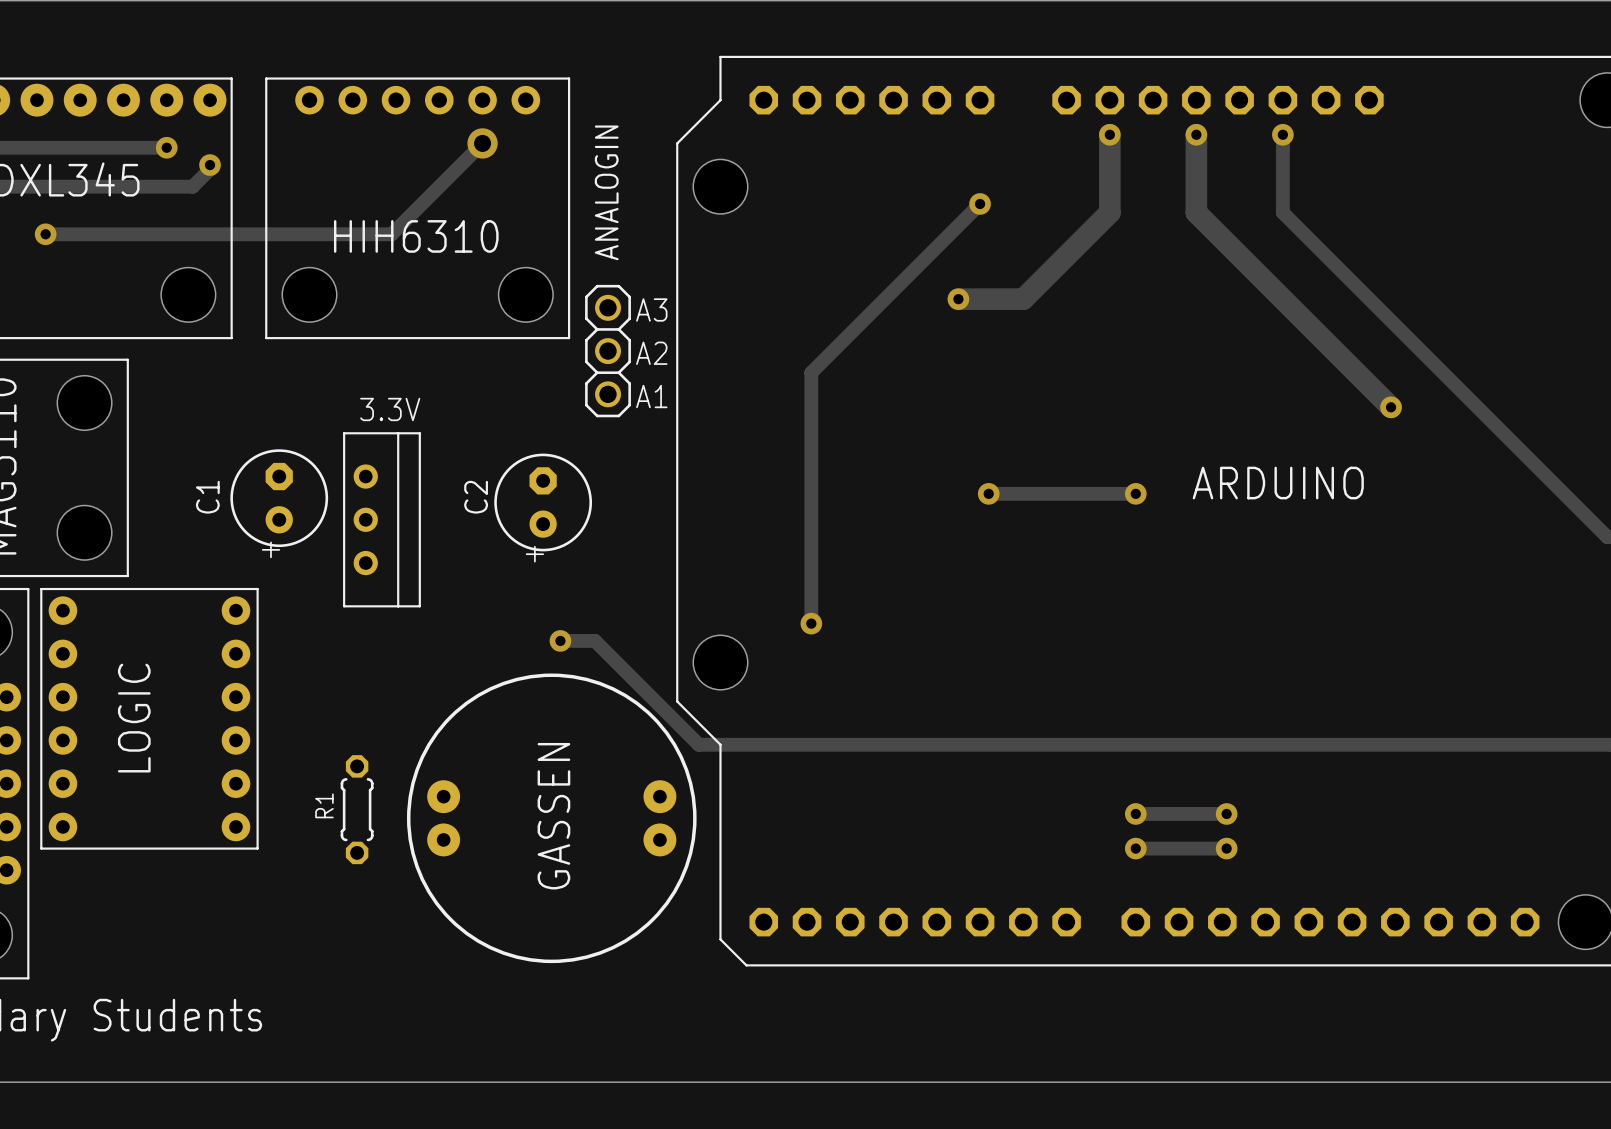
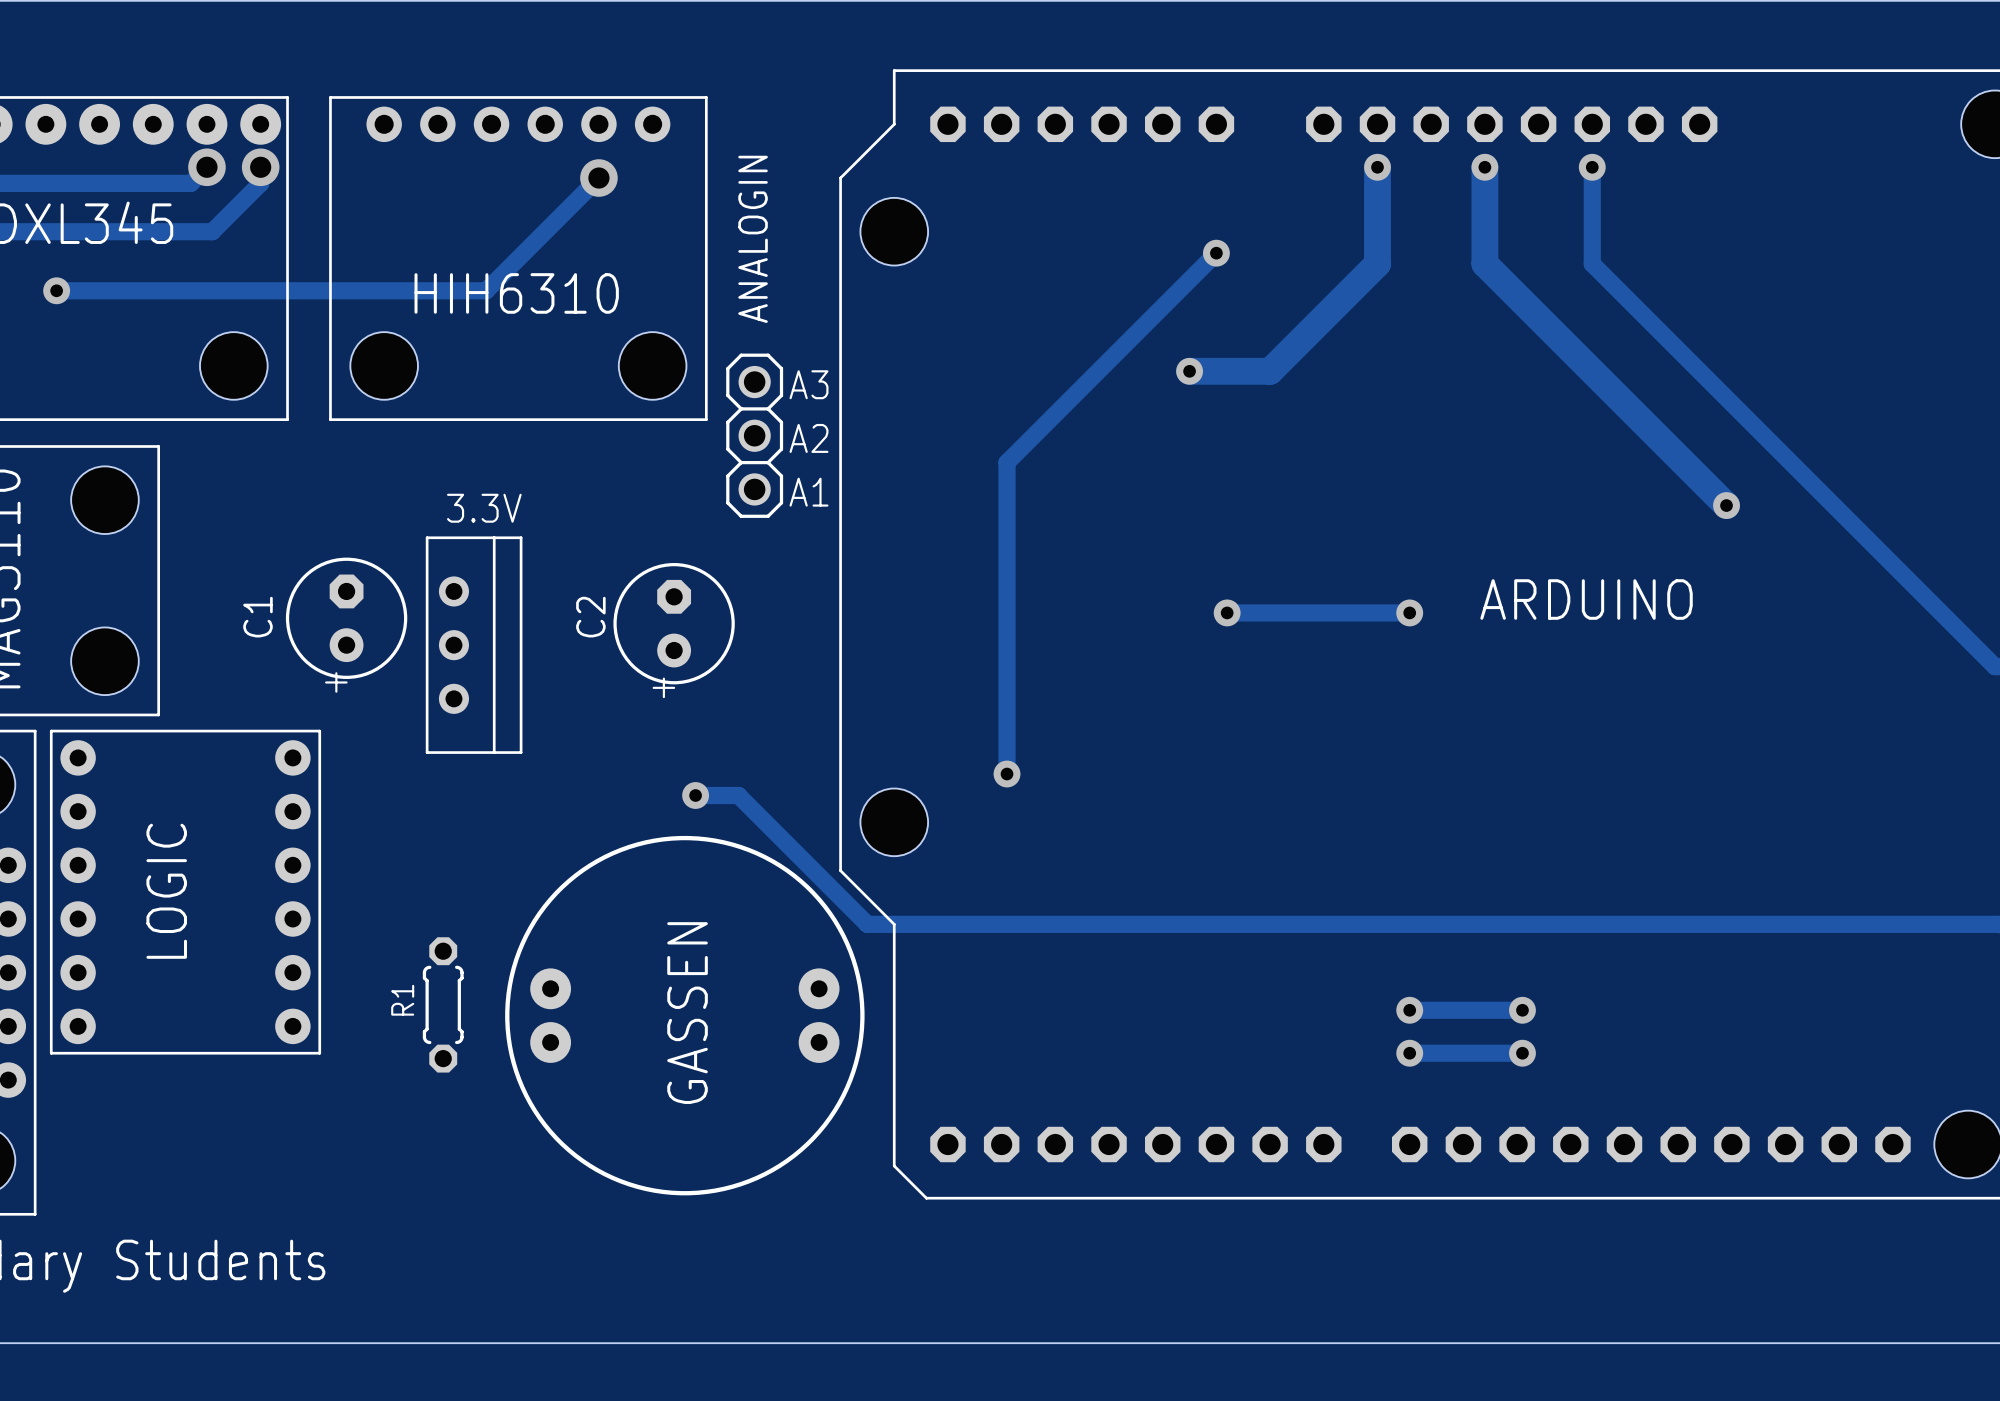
via: none -> (260, 167)
via size: [155, 136, 178, 159] -> [188, 148, 226, 187]
track: (210, 165) (210, 169) (192, 186) (171, 186) -> (260, 167) (260, 183) (212, 231)
via: (210, 165) -> none

